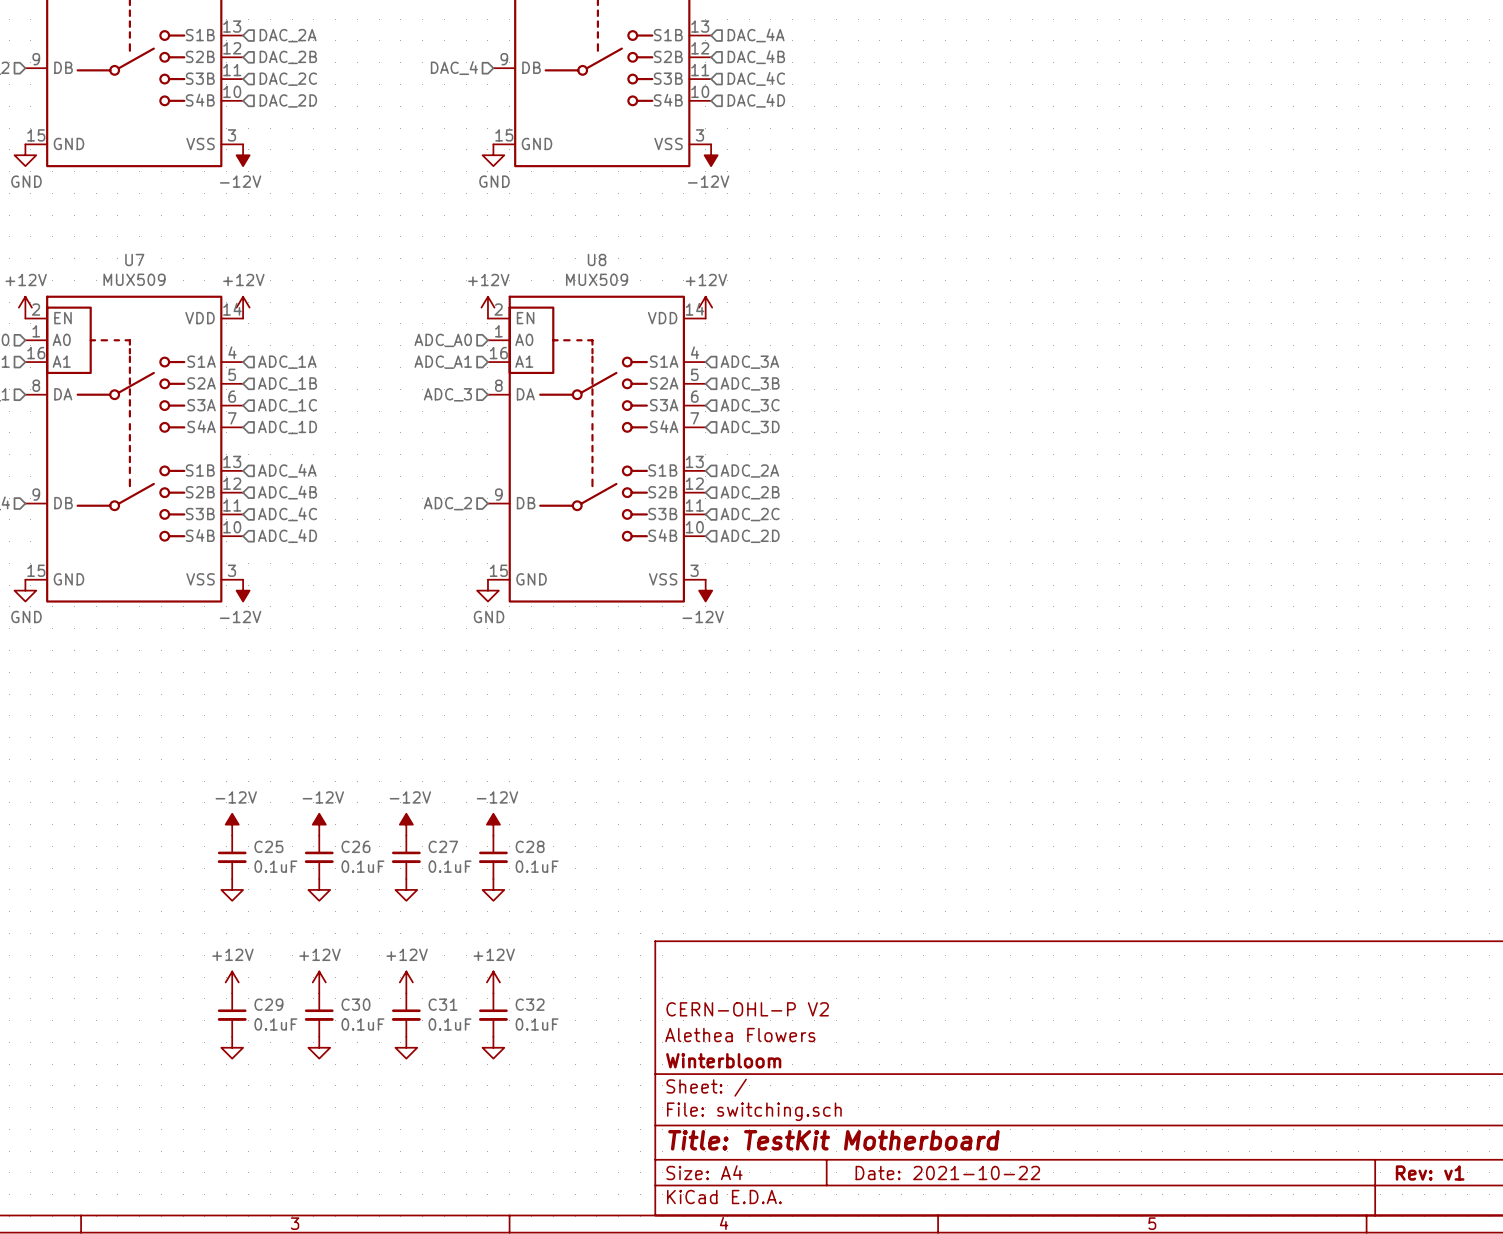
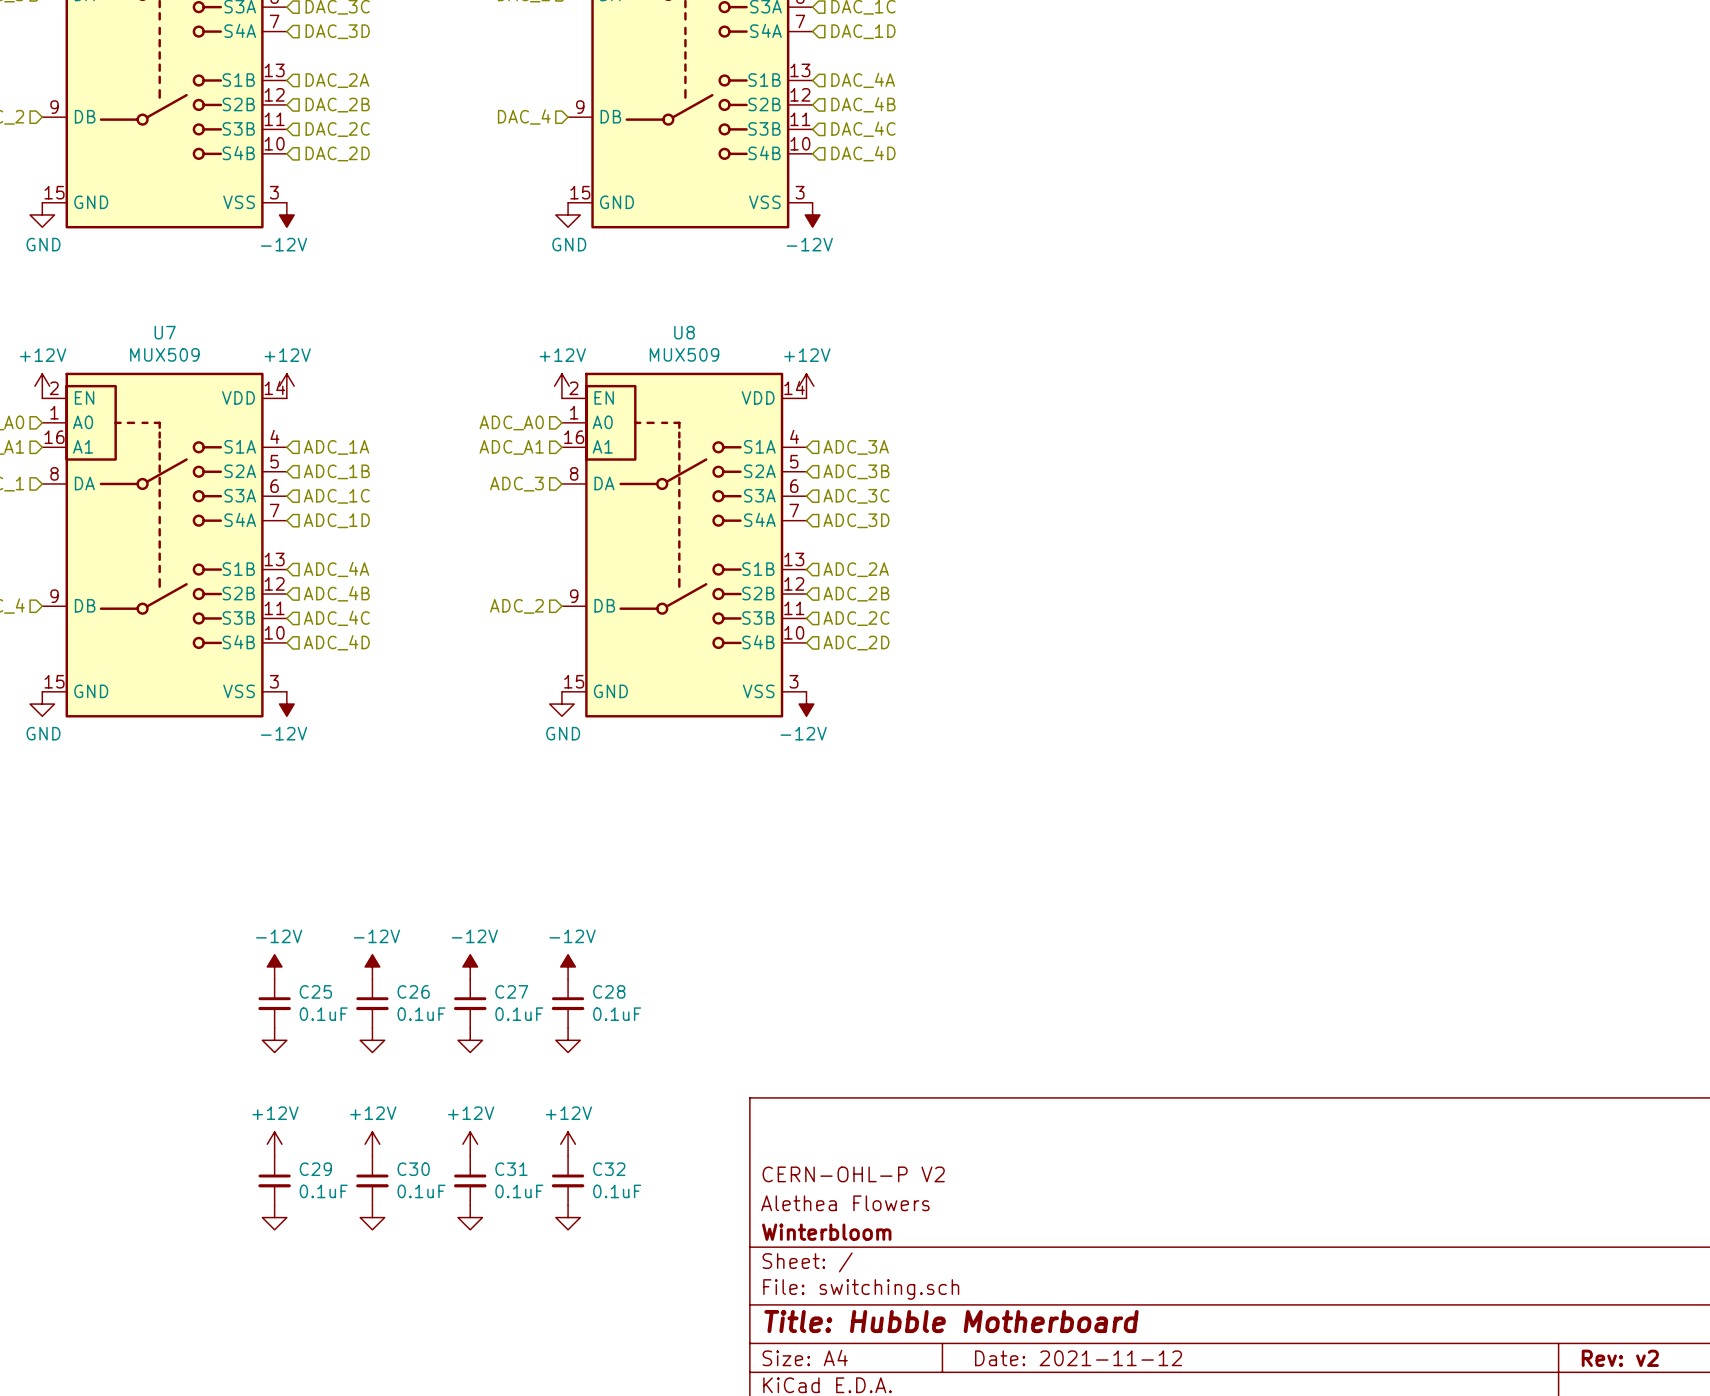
title block: Title: TestKit Motherboard (833, 1140) -> Title: Hubble Motherboard (951, 1321)
title block: Date: 2021-10-22 (947, 1173) -> Date: 2021-11-12 (1078, 1358)
title block: Rev: v1 (1430, 1173) -> Rev: v2 (1620, 1358)

